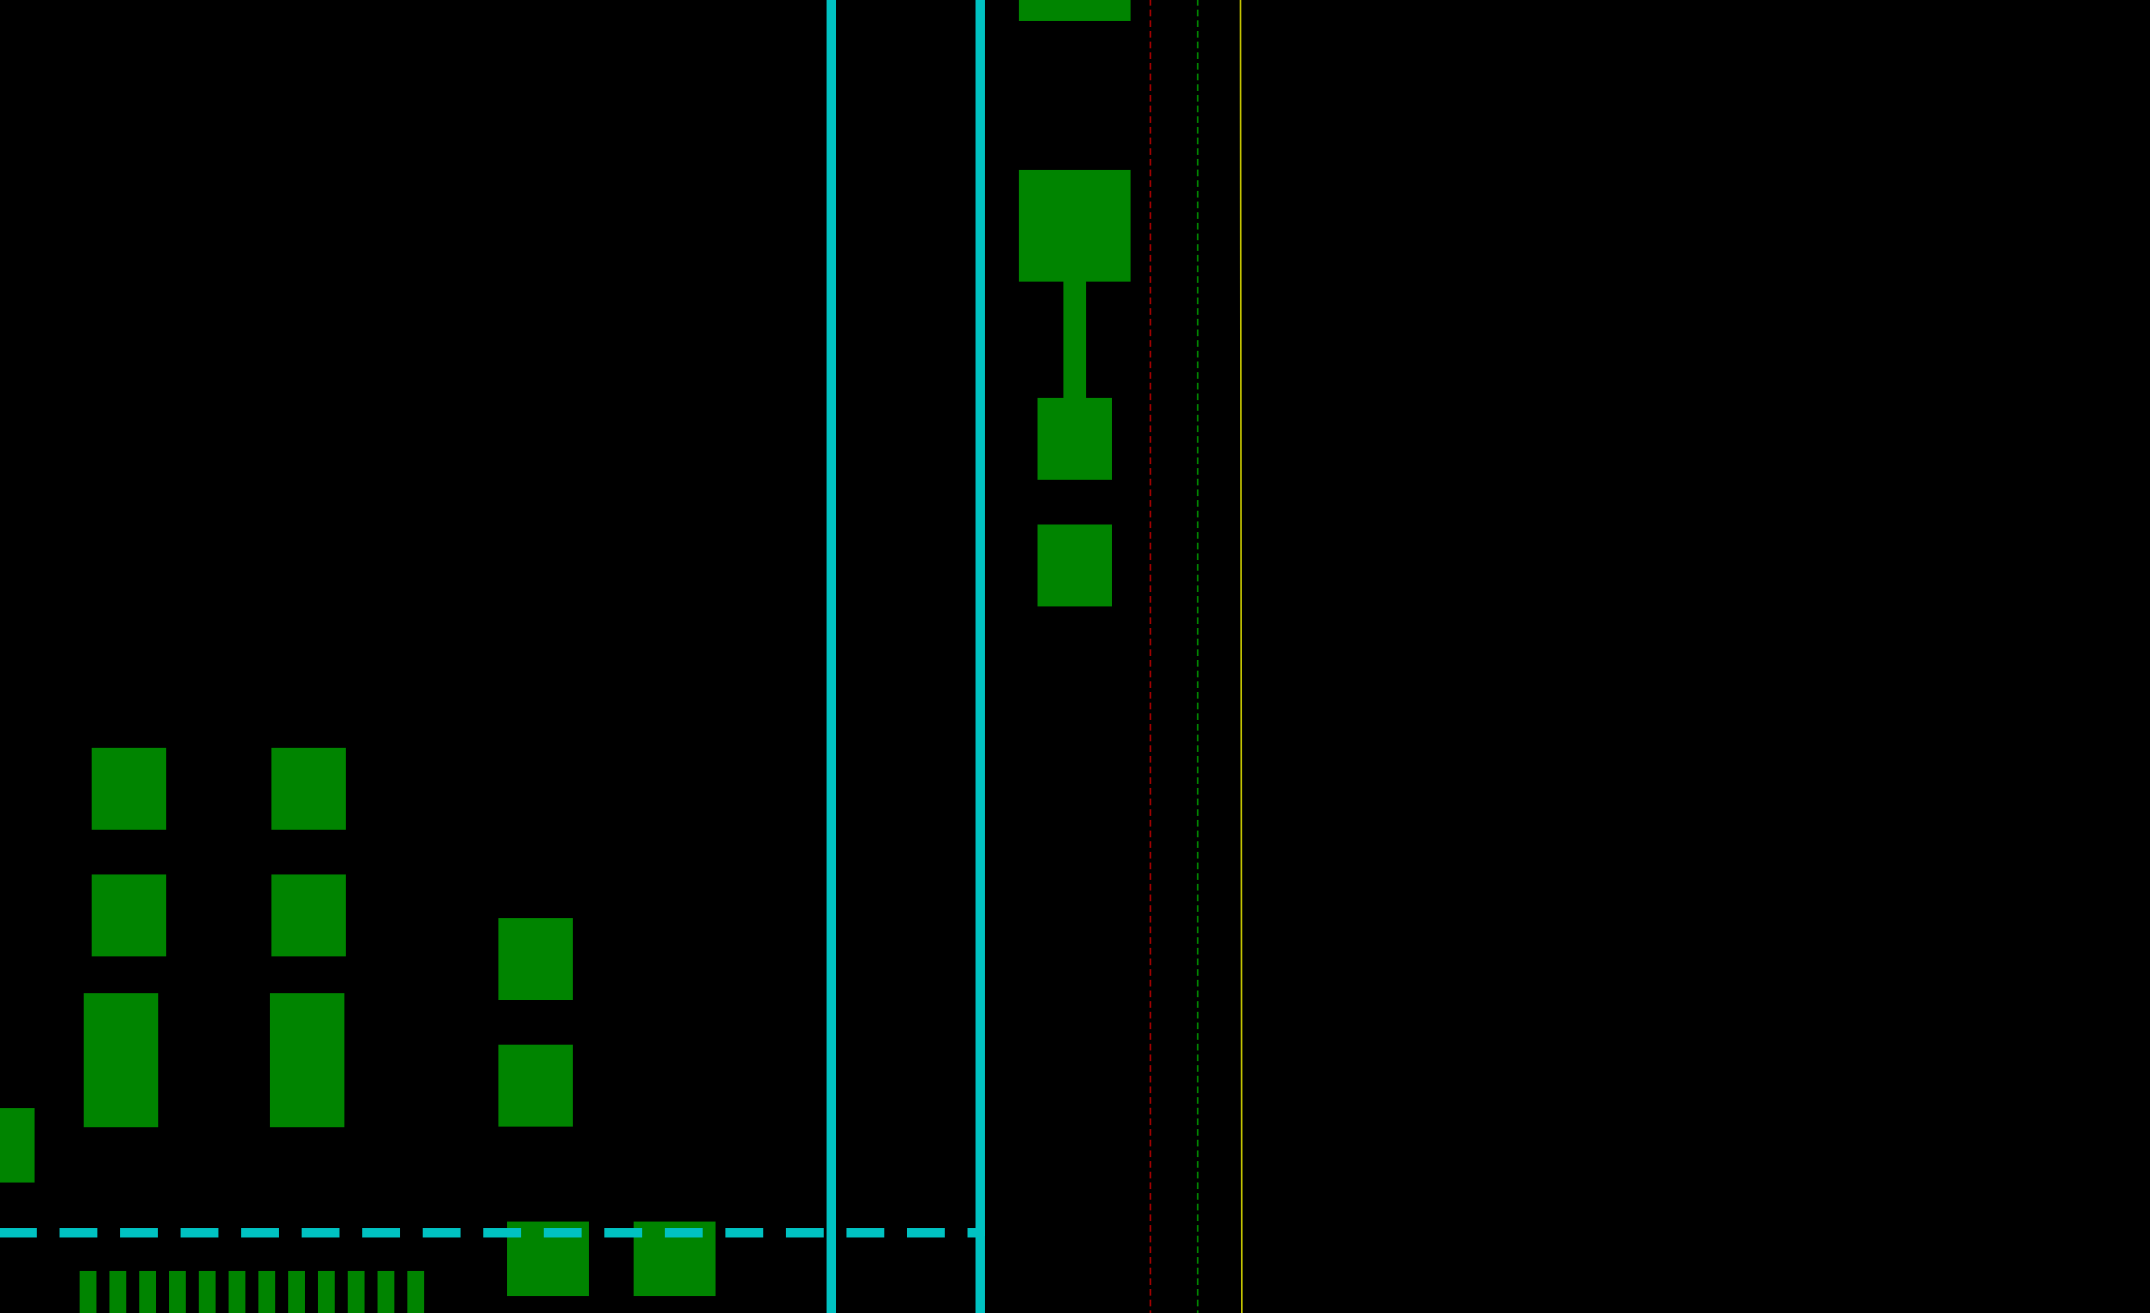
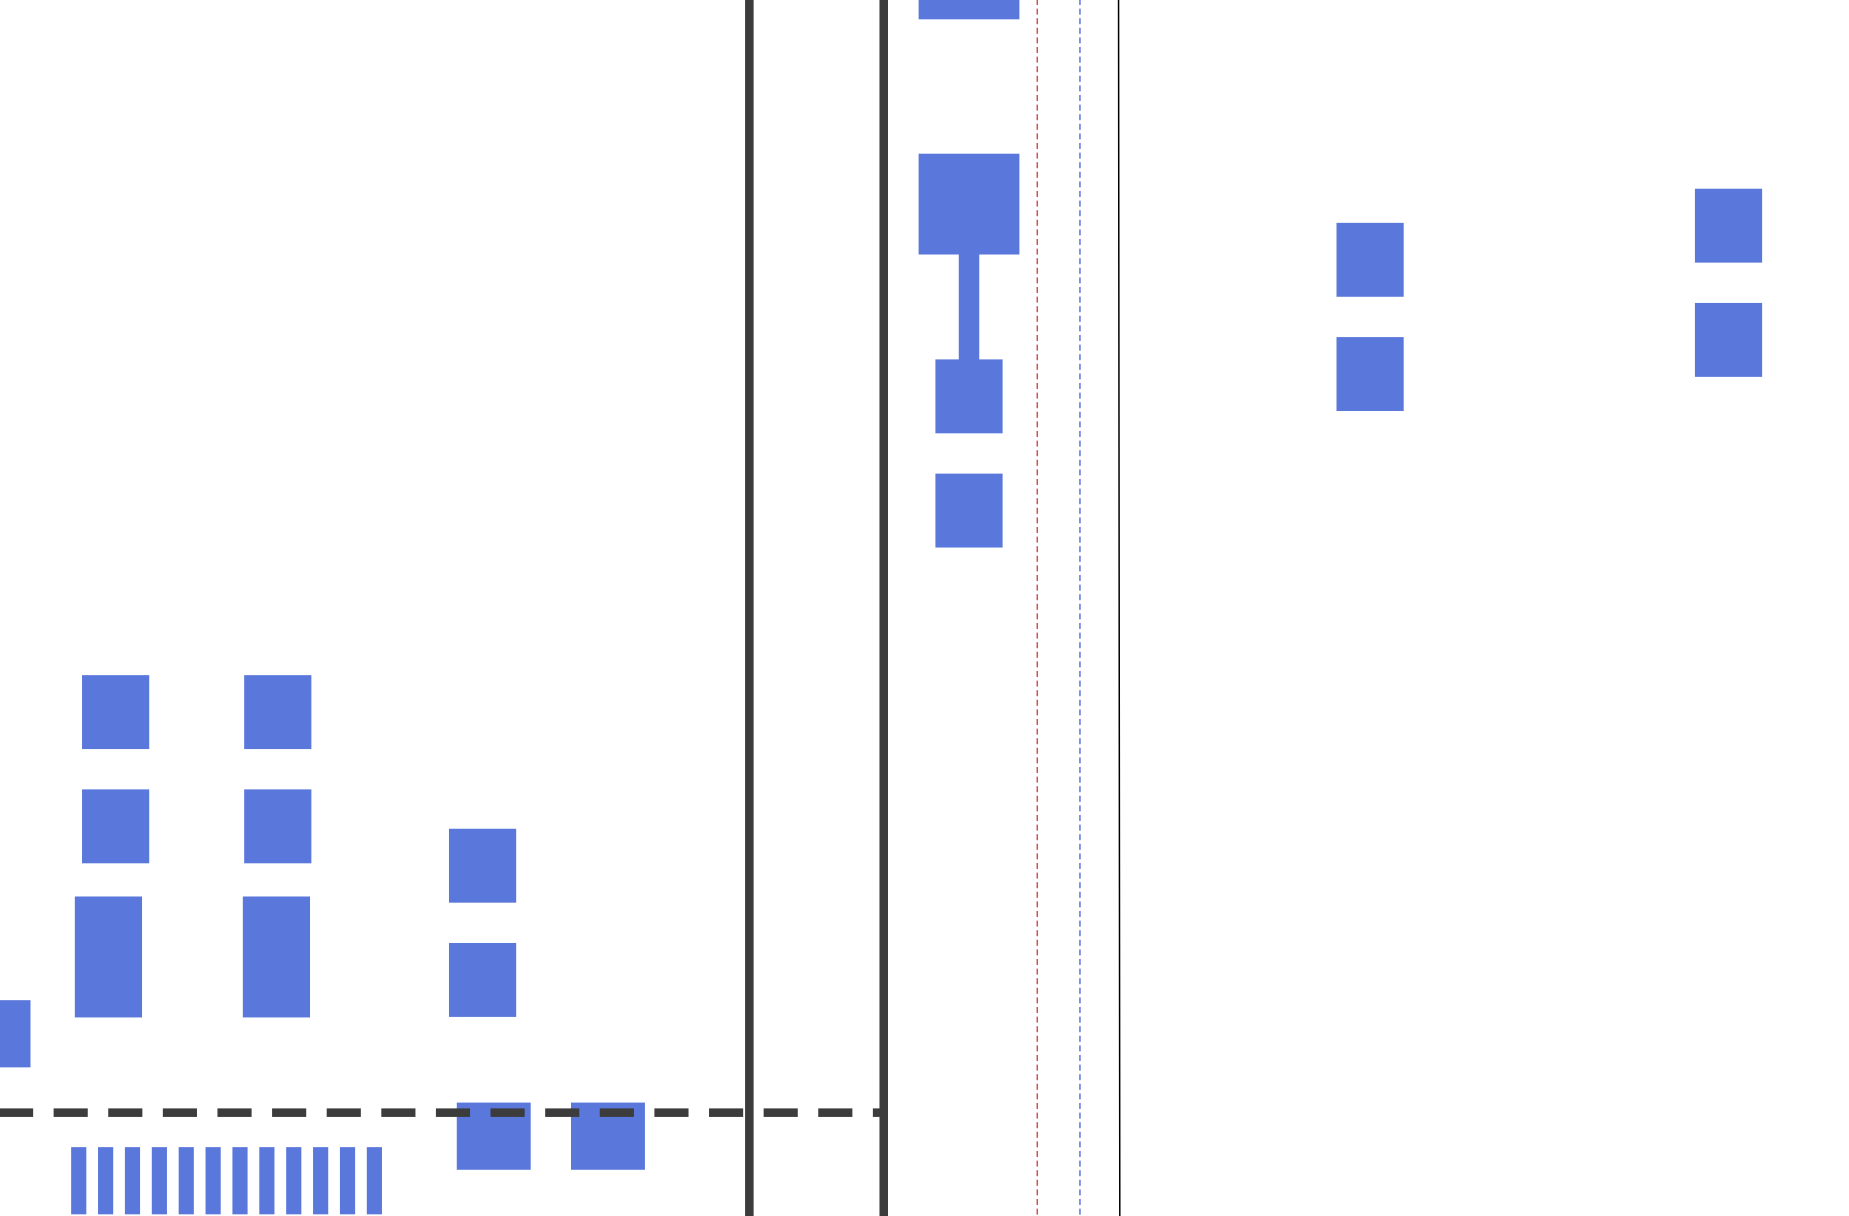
part: none -> (1728, 282)
part: none -> (1370, 316)

